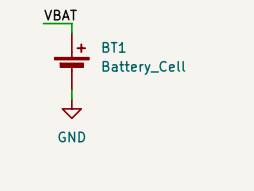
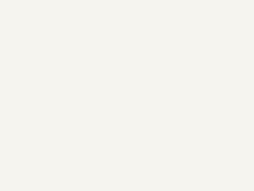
label: VBAT (60, 15) -> none
wire: (43, 23) (71, 23) (71, 33) -> none
BT1: Battery_Cell (71, 61) -> none
wire: (71, 89) (71, 99) -> none
power symbol: GND (71, 108) -> none

